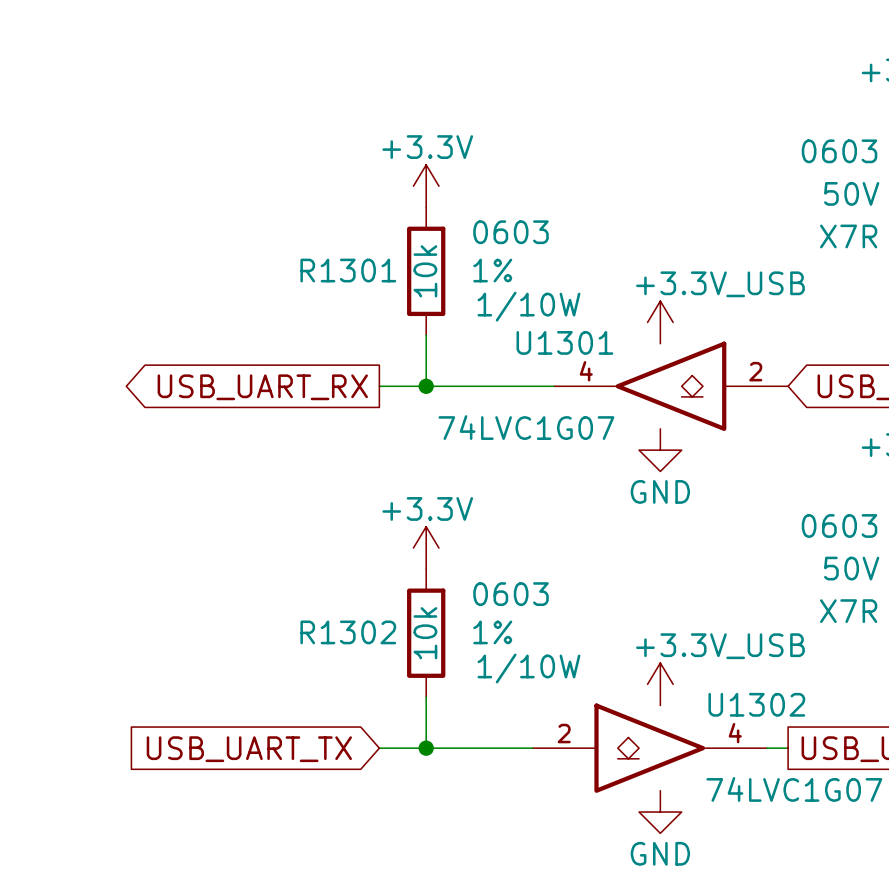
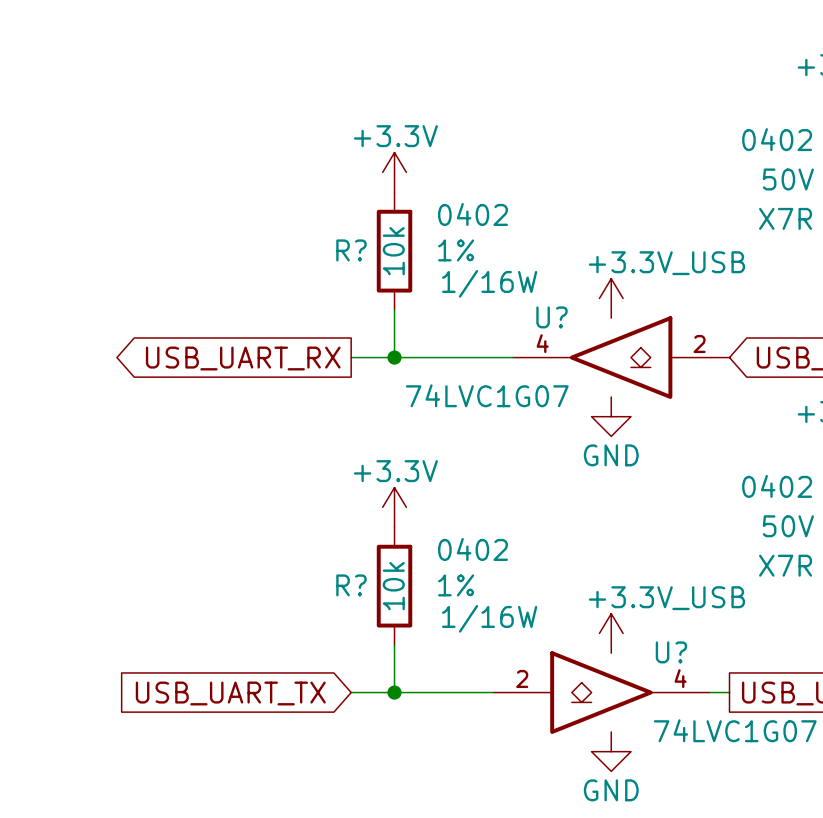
part text: 0603 (839, 151) -> 0402 (777, 139)
R1301 text: 0603 (511, 232) -> 0402 (473, 214)
R1301 name: R1301 (348, 270) -> R? (351, 250)
R1301 text: 1/10W (528, 306) -> 1/16W (489, 283)
U1301 name: U1301 (564, 342) -> U? (552, 317)
part text: 0603 (839, 525) -> 0402 (777, 486)
R1302 text: 0603 (511, 594) -> 0402 (473, 549)
R1302 name: R1302 (348, 632) -> R? (351, 585)
R1302 text: 1/10W (528, 668) -> 1/16W (489, 618)
U1302 name: U1302 (756, 704) -> U? (671, 652)

